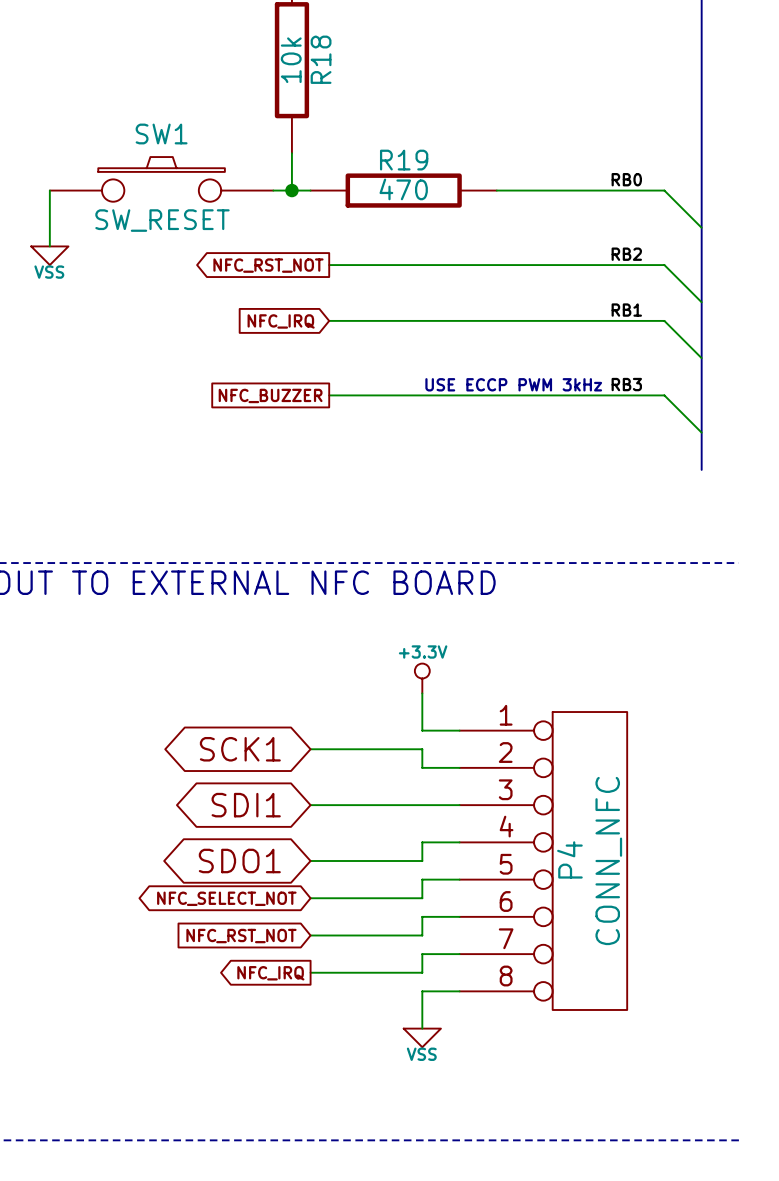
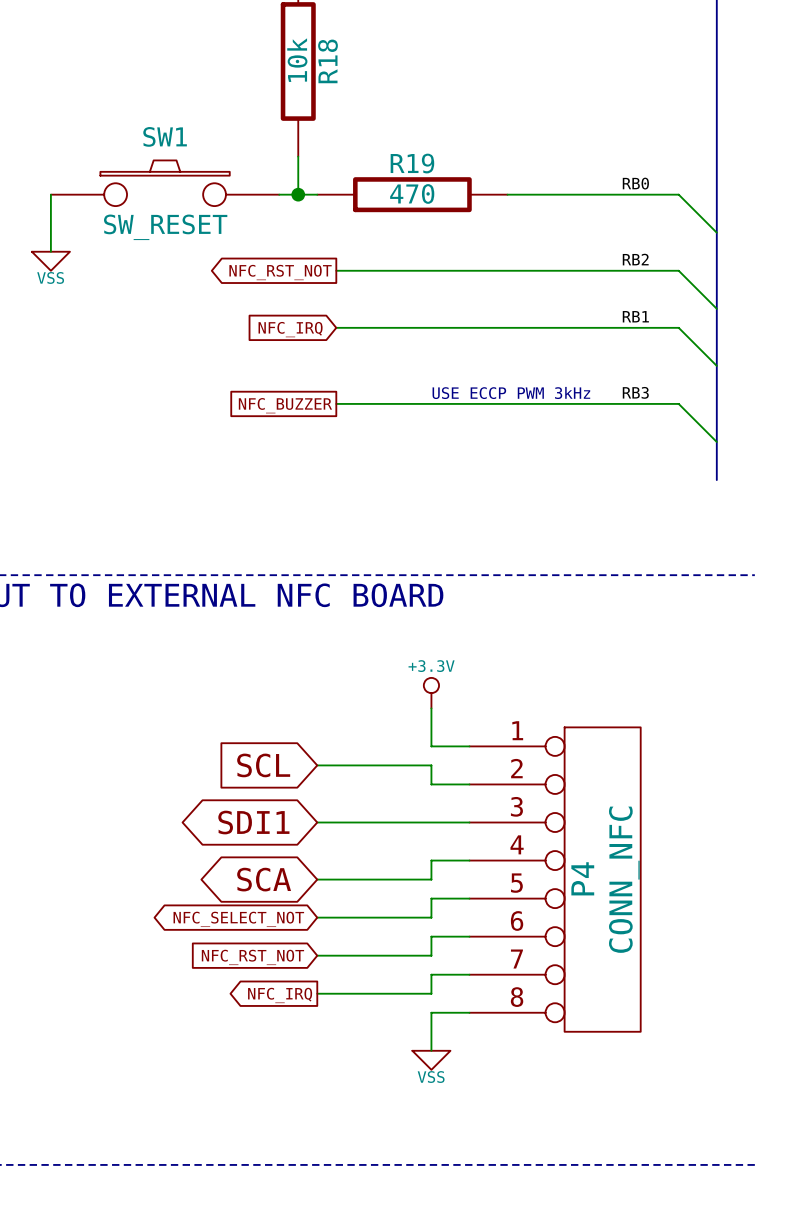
global label shape: bidirectional (240, 749) -> input (263, 765)
global label: SCK1 (240, 749) -> SCL (263, 765)
global label: SDO1 (239, 861) -> SCA (264, 879)

